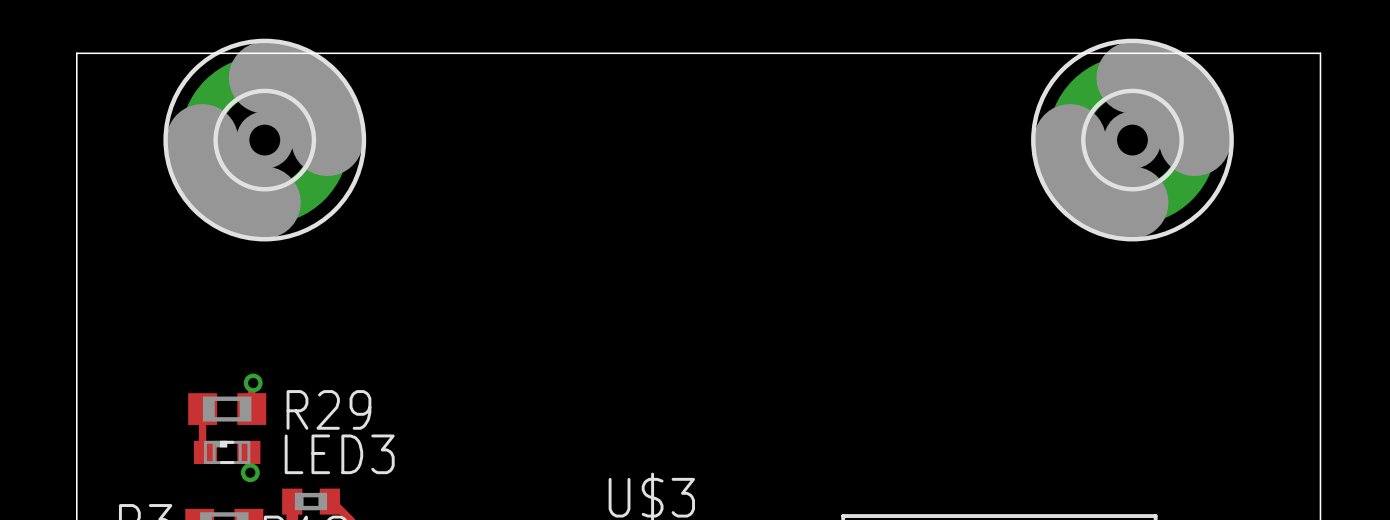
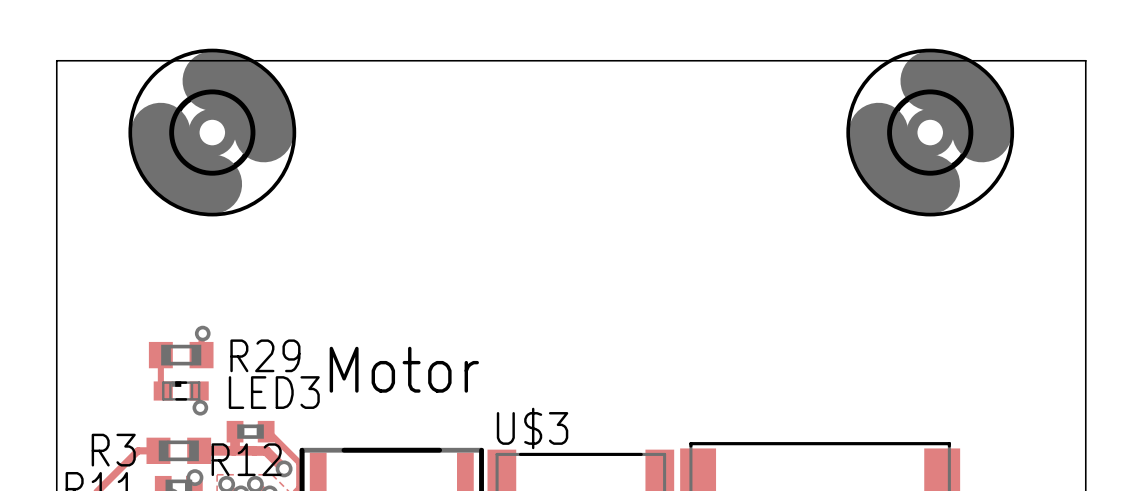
part footprint: [163, 38, 367, 242] -> [128, 48, 297, 217]
part footprint: [1031, 38, 1234, 242] -> [846, 48, 1015, 217]
text: none -> Motor (404, 369)

